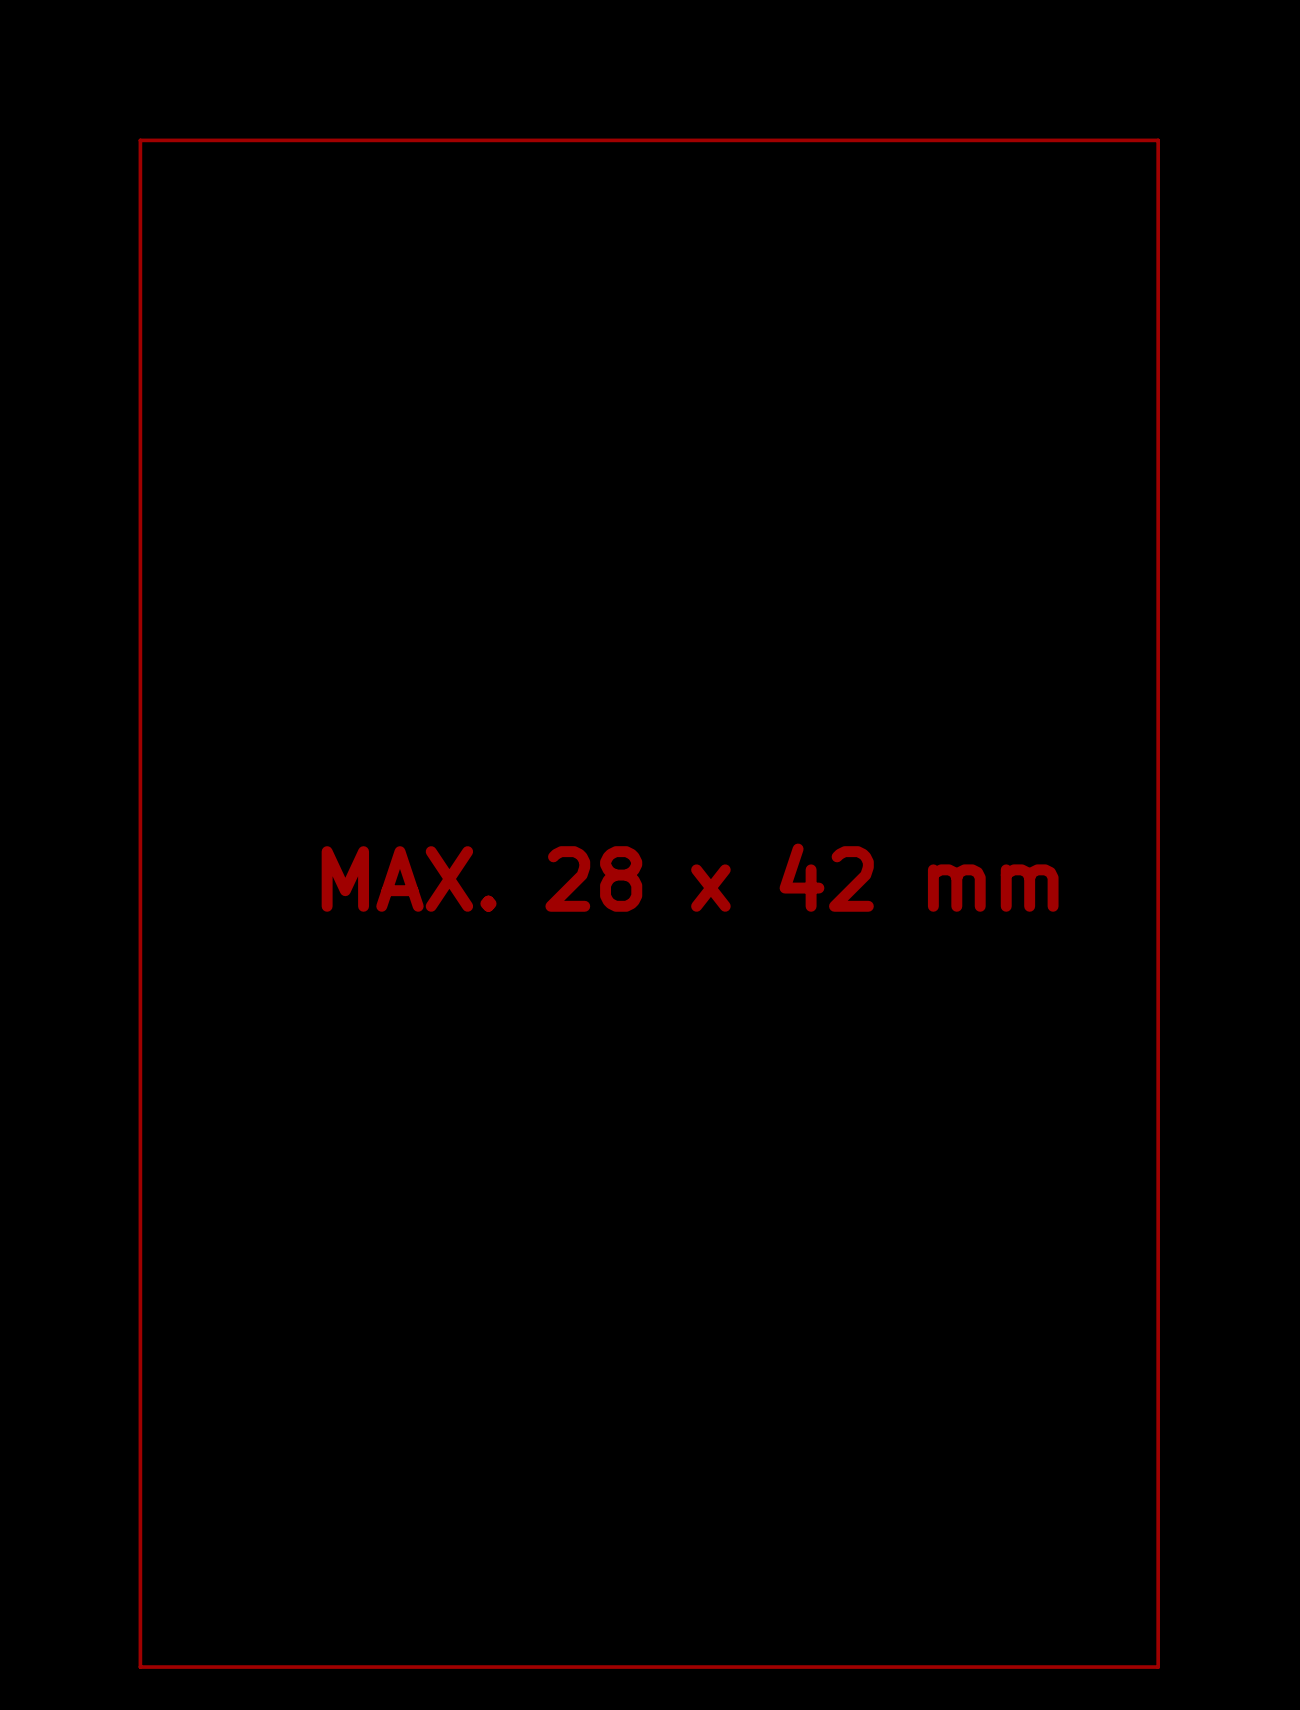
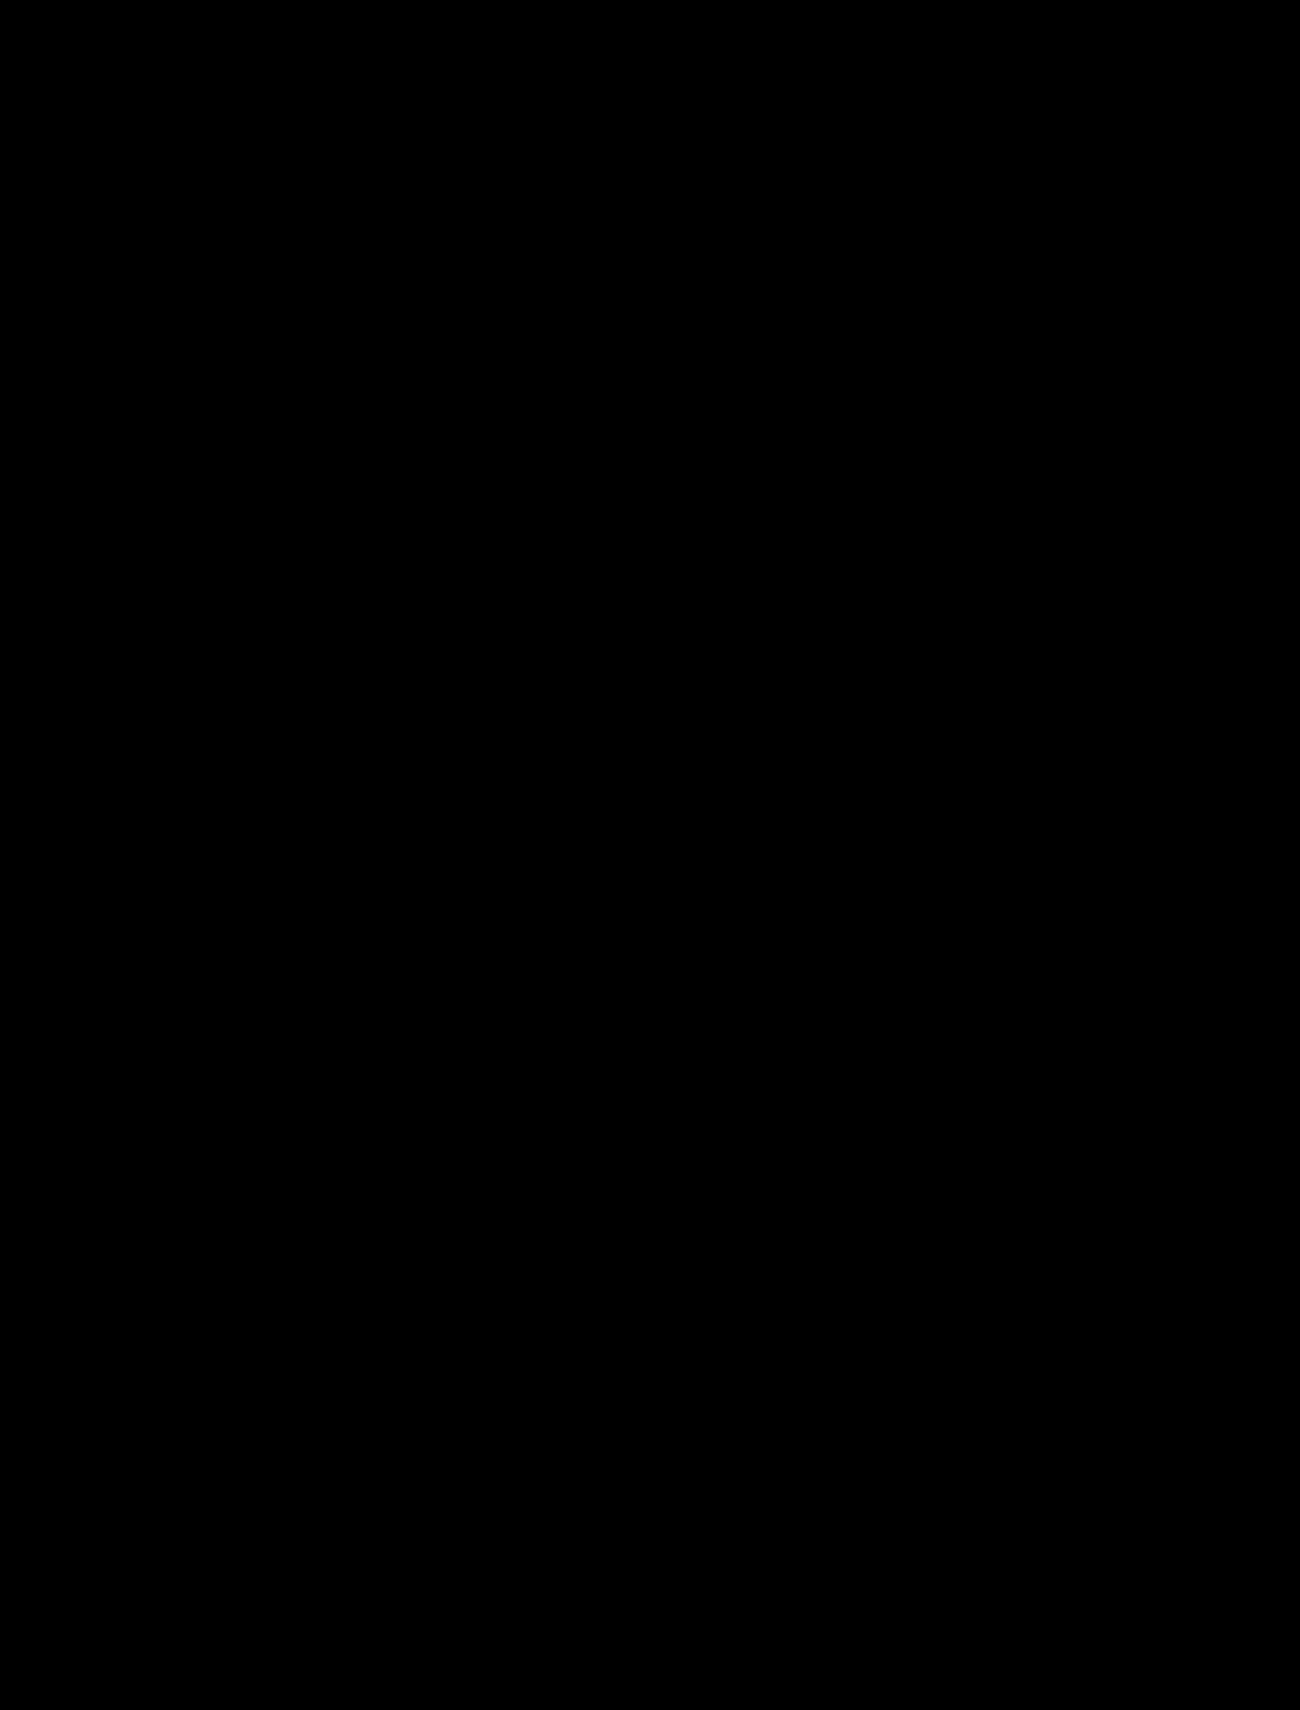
top track: (140, 140) (1158, 140) (1158, 1667) (140, 1667) (140, 140) -> none
text: MAX. 28 x 42 mm (690, 877) -> none

